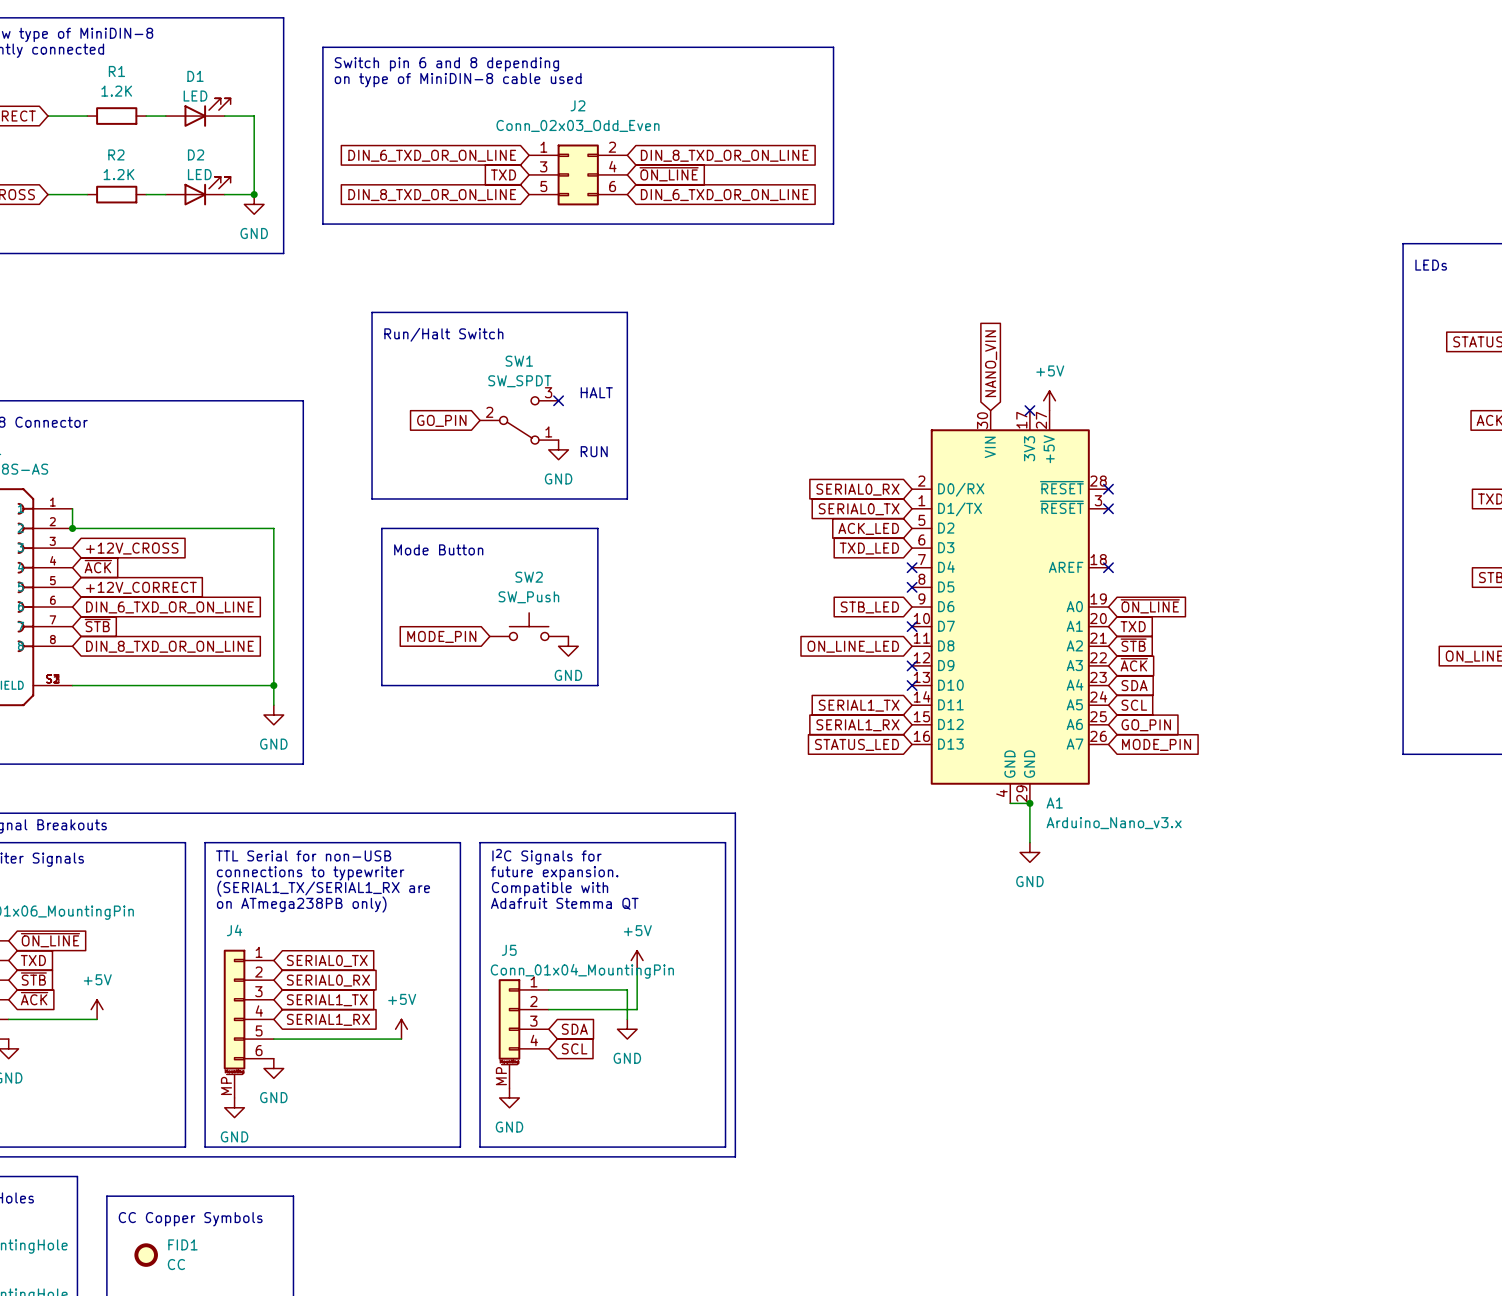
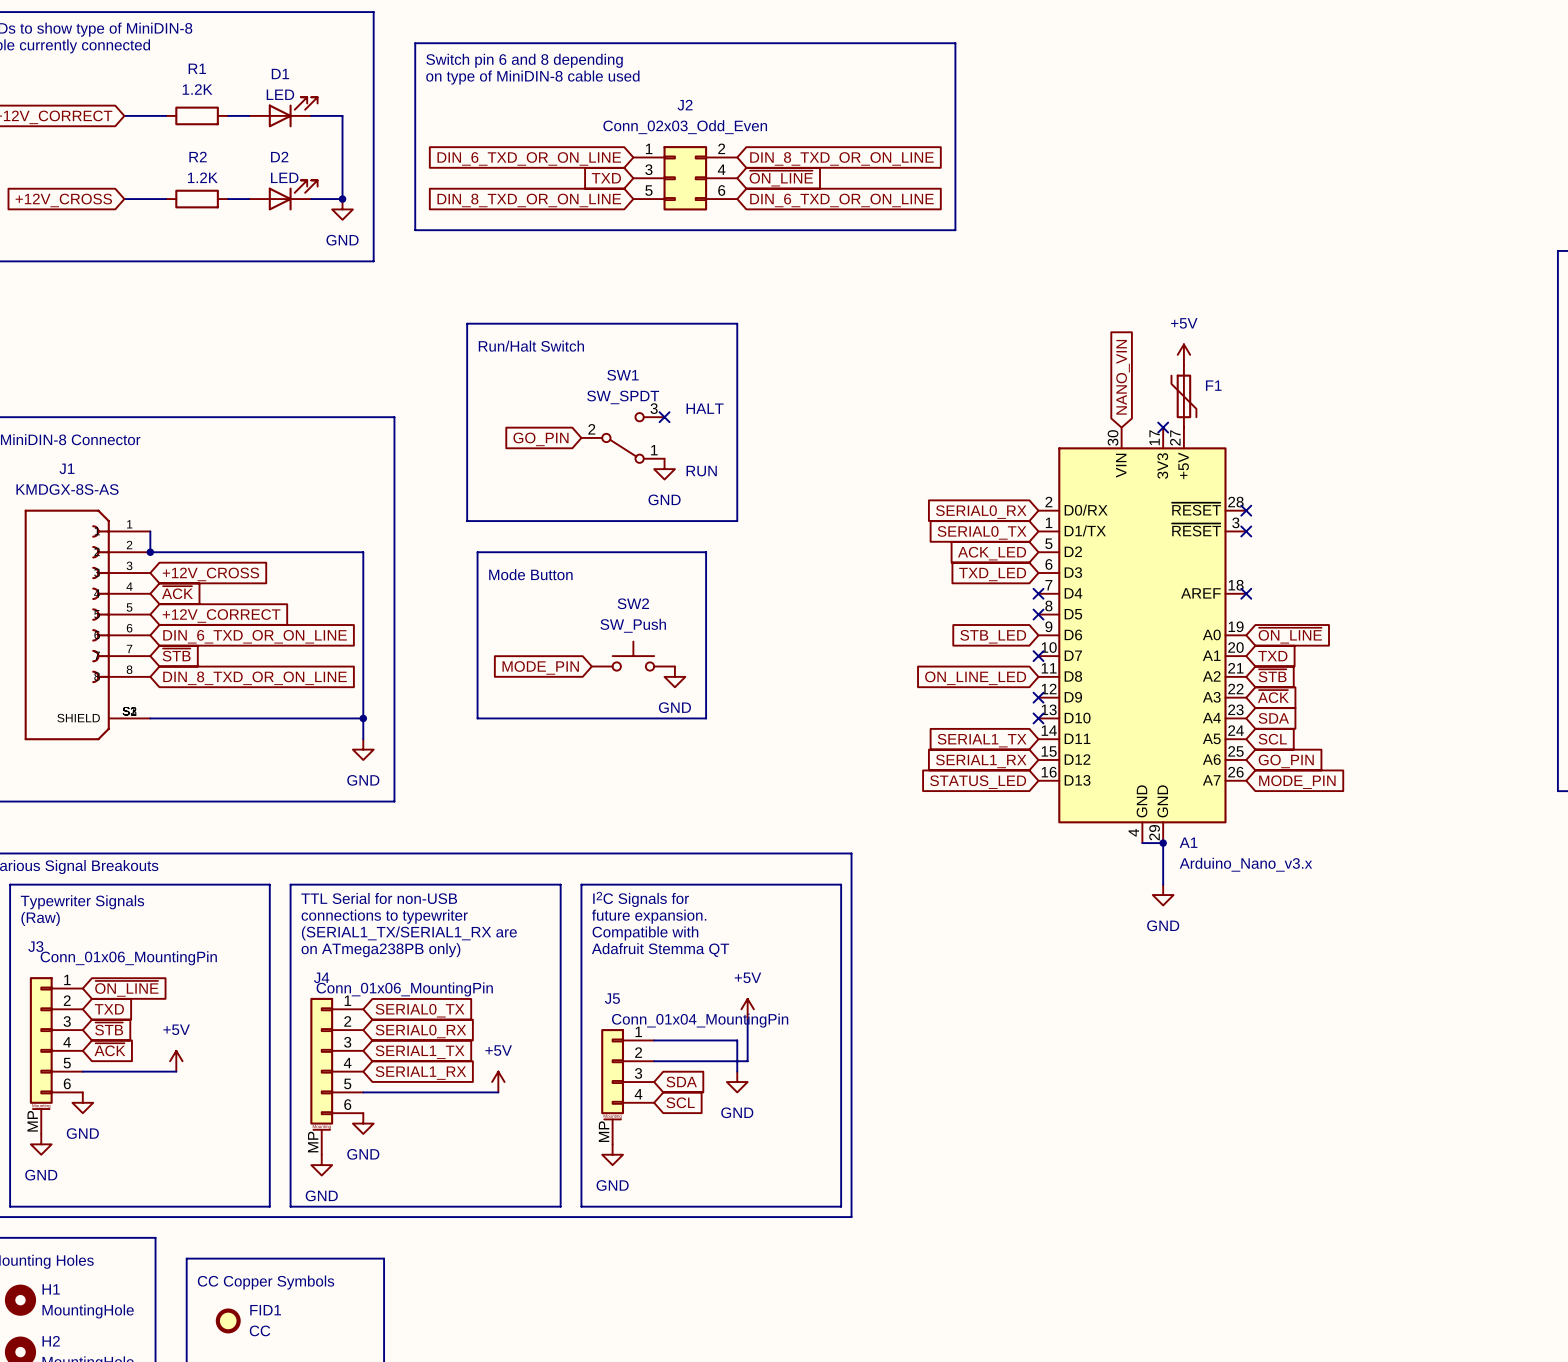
F1: none -> (1183, 396)
power symbol position: +5V (1049, 400) -> +5V (1183, 354)
J4 value: none -> Conn_01x06_MountingPin (404, 989)

